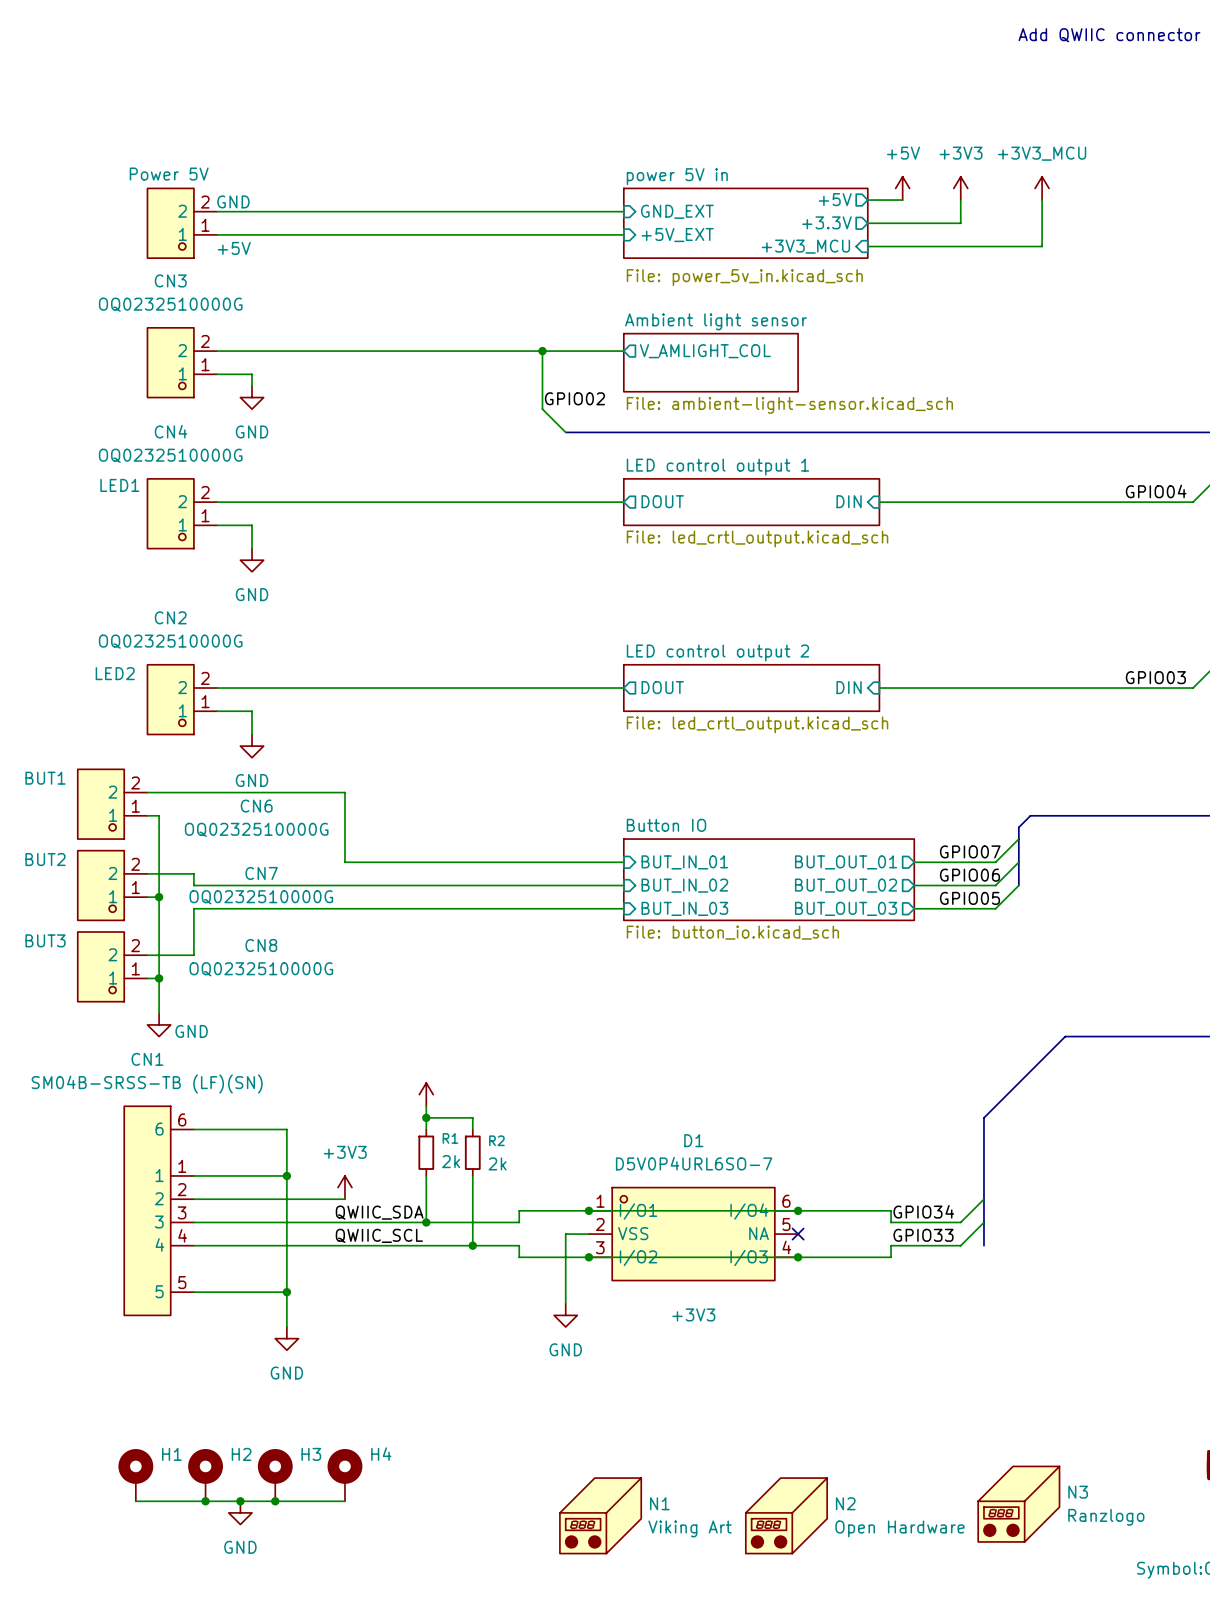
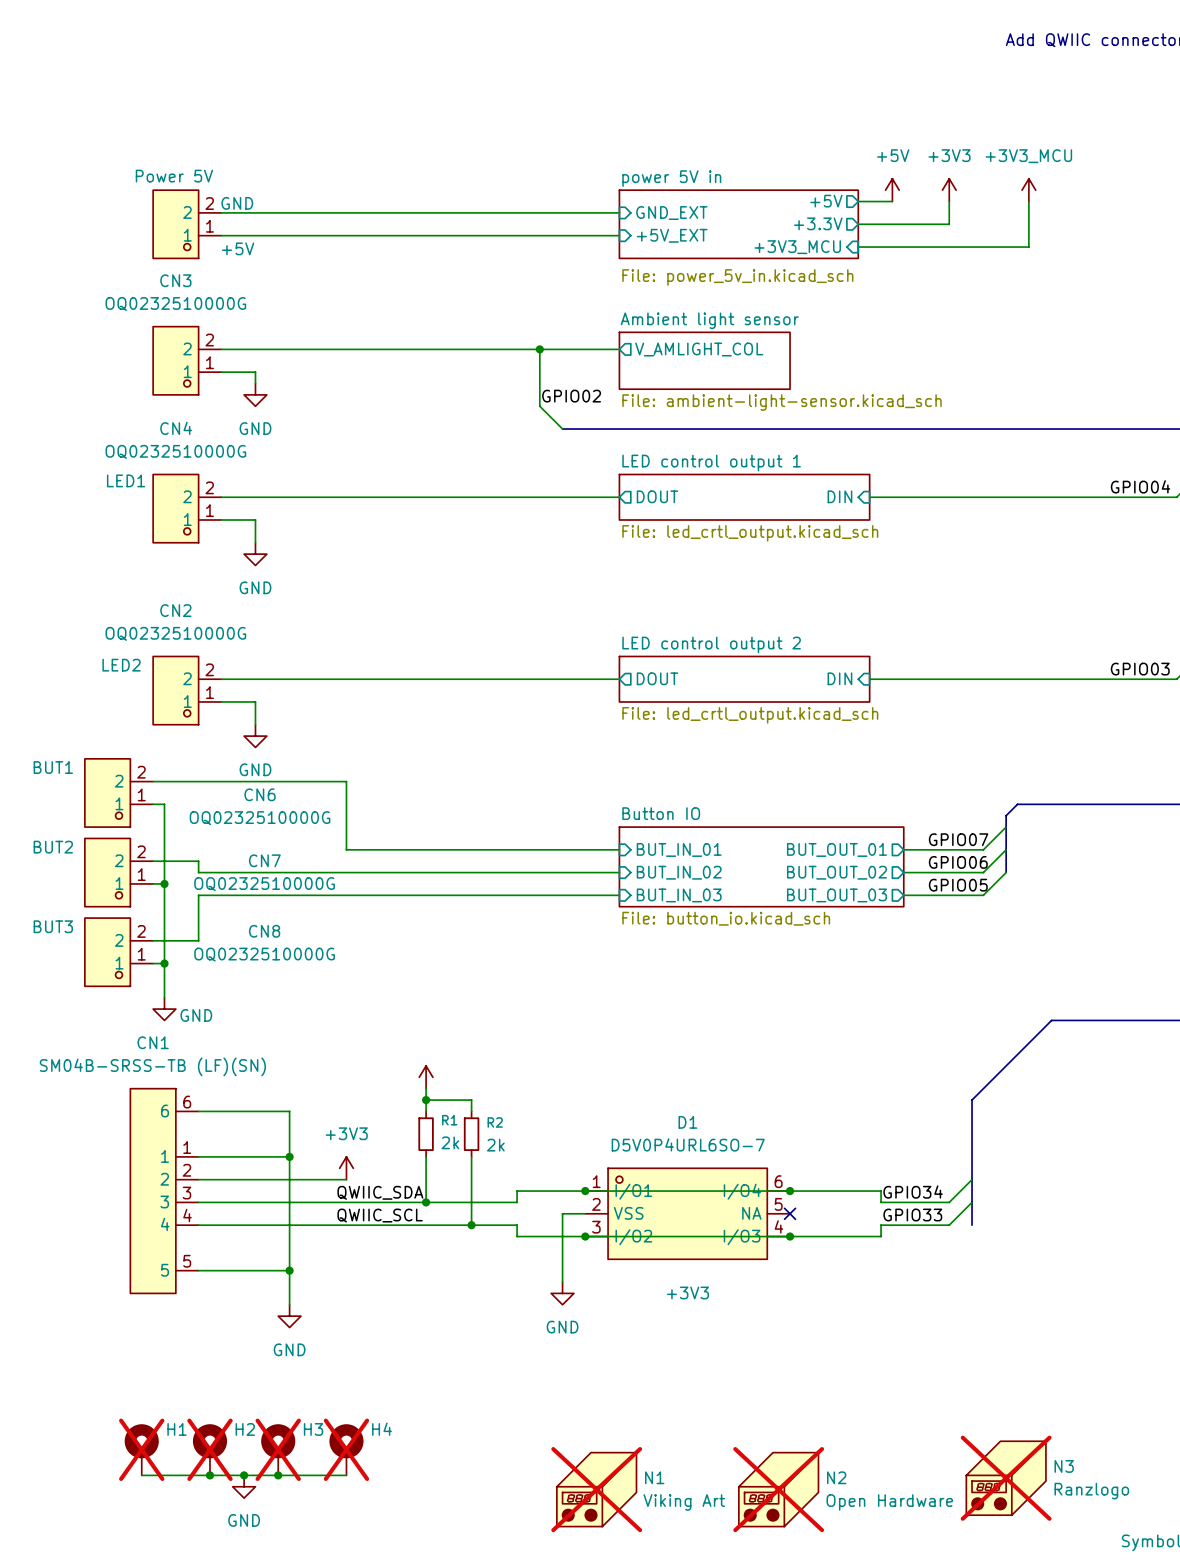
H1 do-not-place cross: none -> (141, 1449)
H2 do-not-place cross: none -> (209, 1449)
H3 do-not-place cross: none -> (278, 1449)
H4 do-not-place cross: none -> (346, 1449)
N3 do-not-place cross: none -> (1006, 1478)
N1 do-not-place cross: none -> (596, 1489)
N2 do-not-place cross: none -> (778, 1489)

